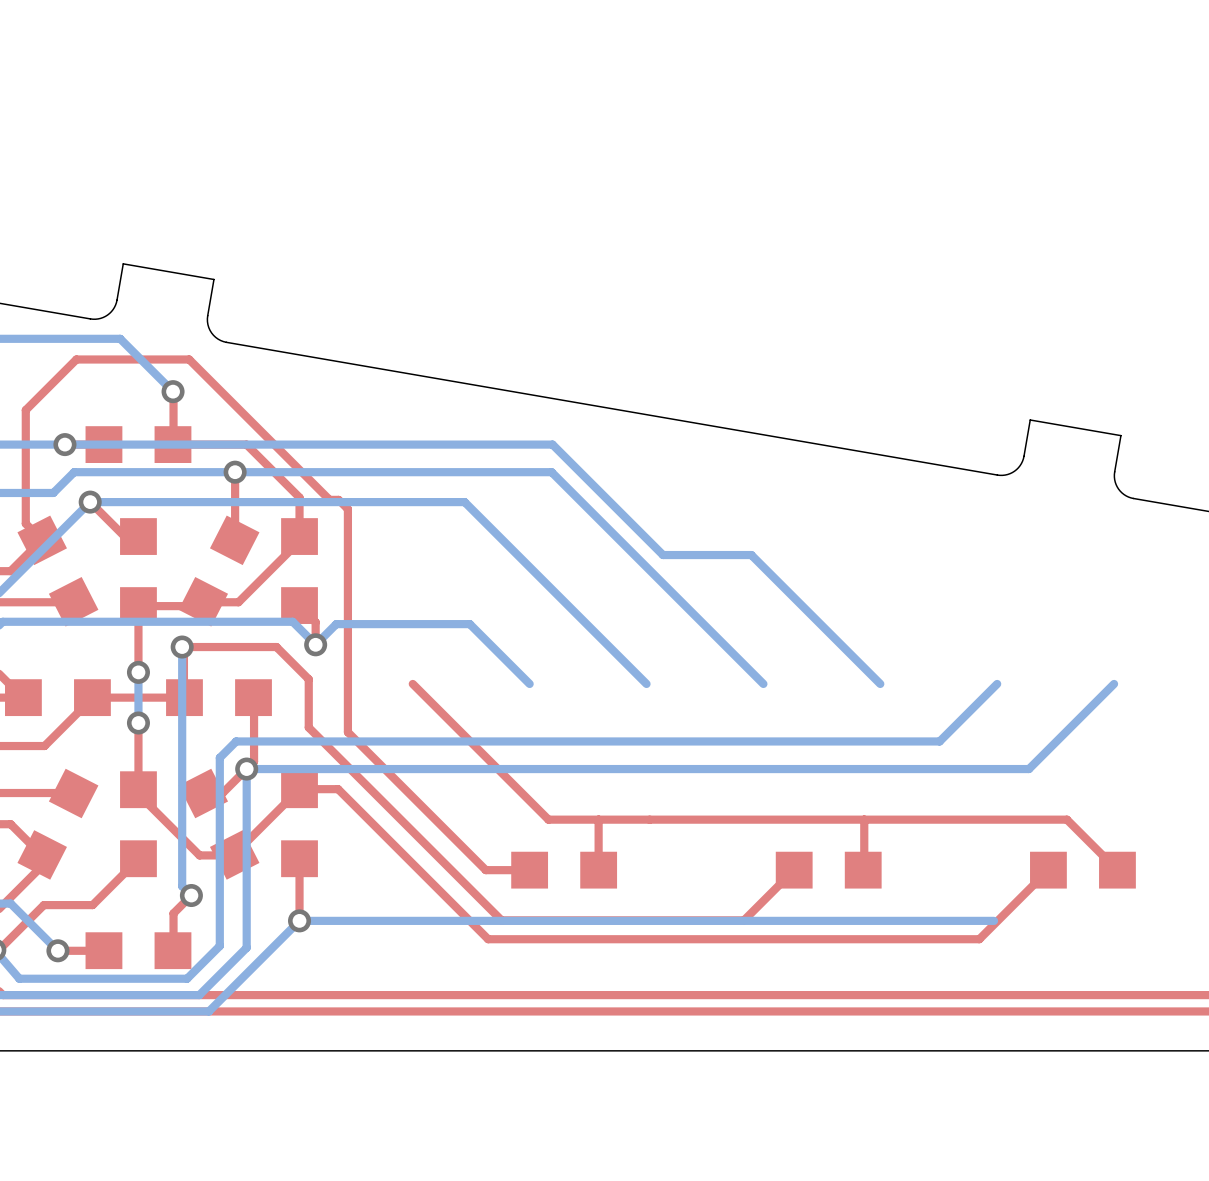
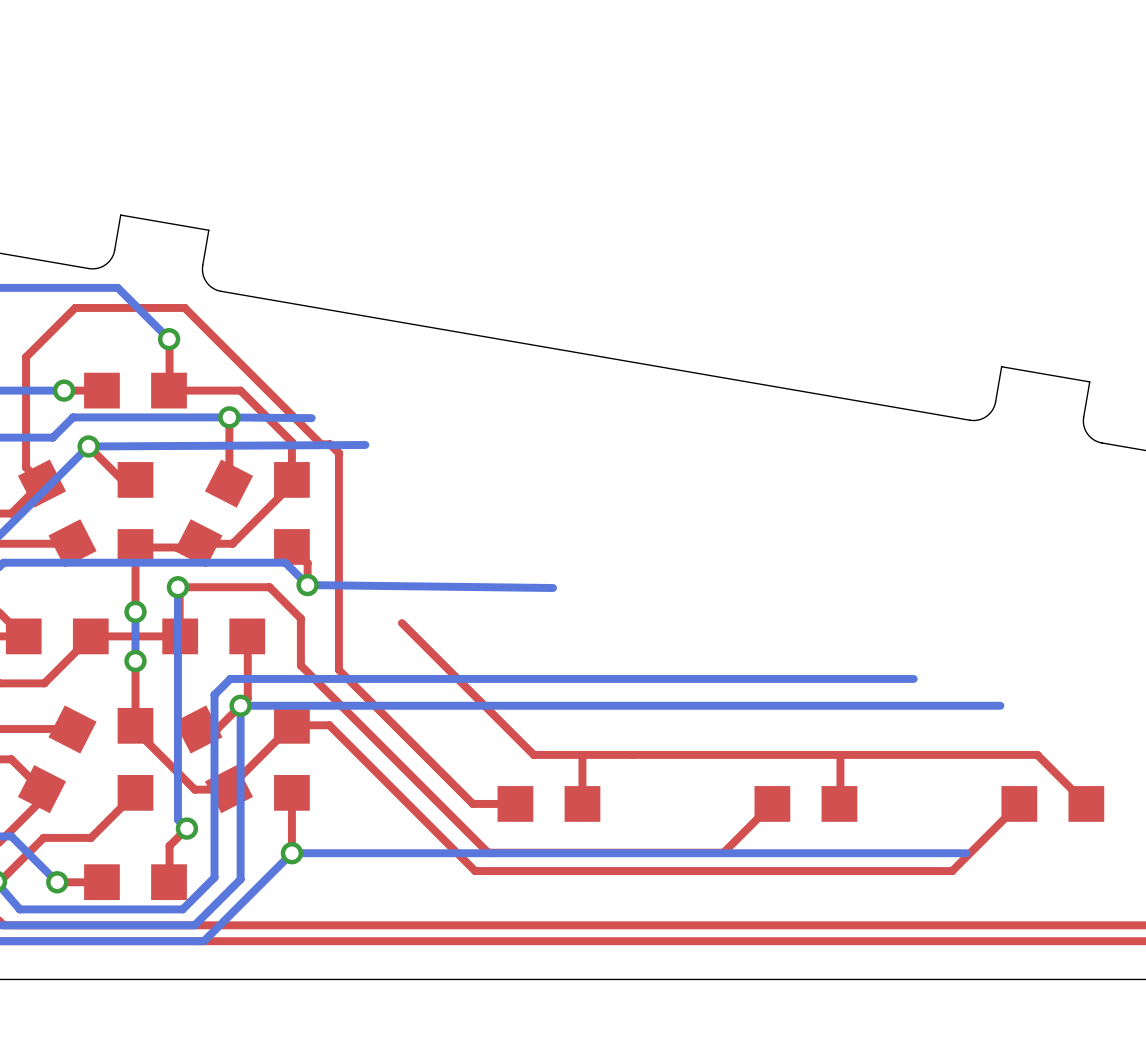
bottom track: (64, 444) (552, 444) (663, 555) (751, 555) (880, 683) -> none
bottom track: (235, 472) (551, 472) (763, 683) -> (229, 417) (311, 418)
bottom track: (90, 502) (464, 502) (646, 683) -> (88, 446) (365, 444)
bottom track: (315, 644) (336, 624) (469, 624) (529, 683) -> (307, 585) (553, 588)
bottom track: (997, 683) (939, 741) -> none
bottom track: (1114, 683) (1028, 769) -> none

